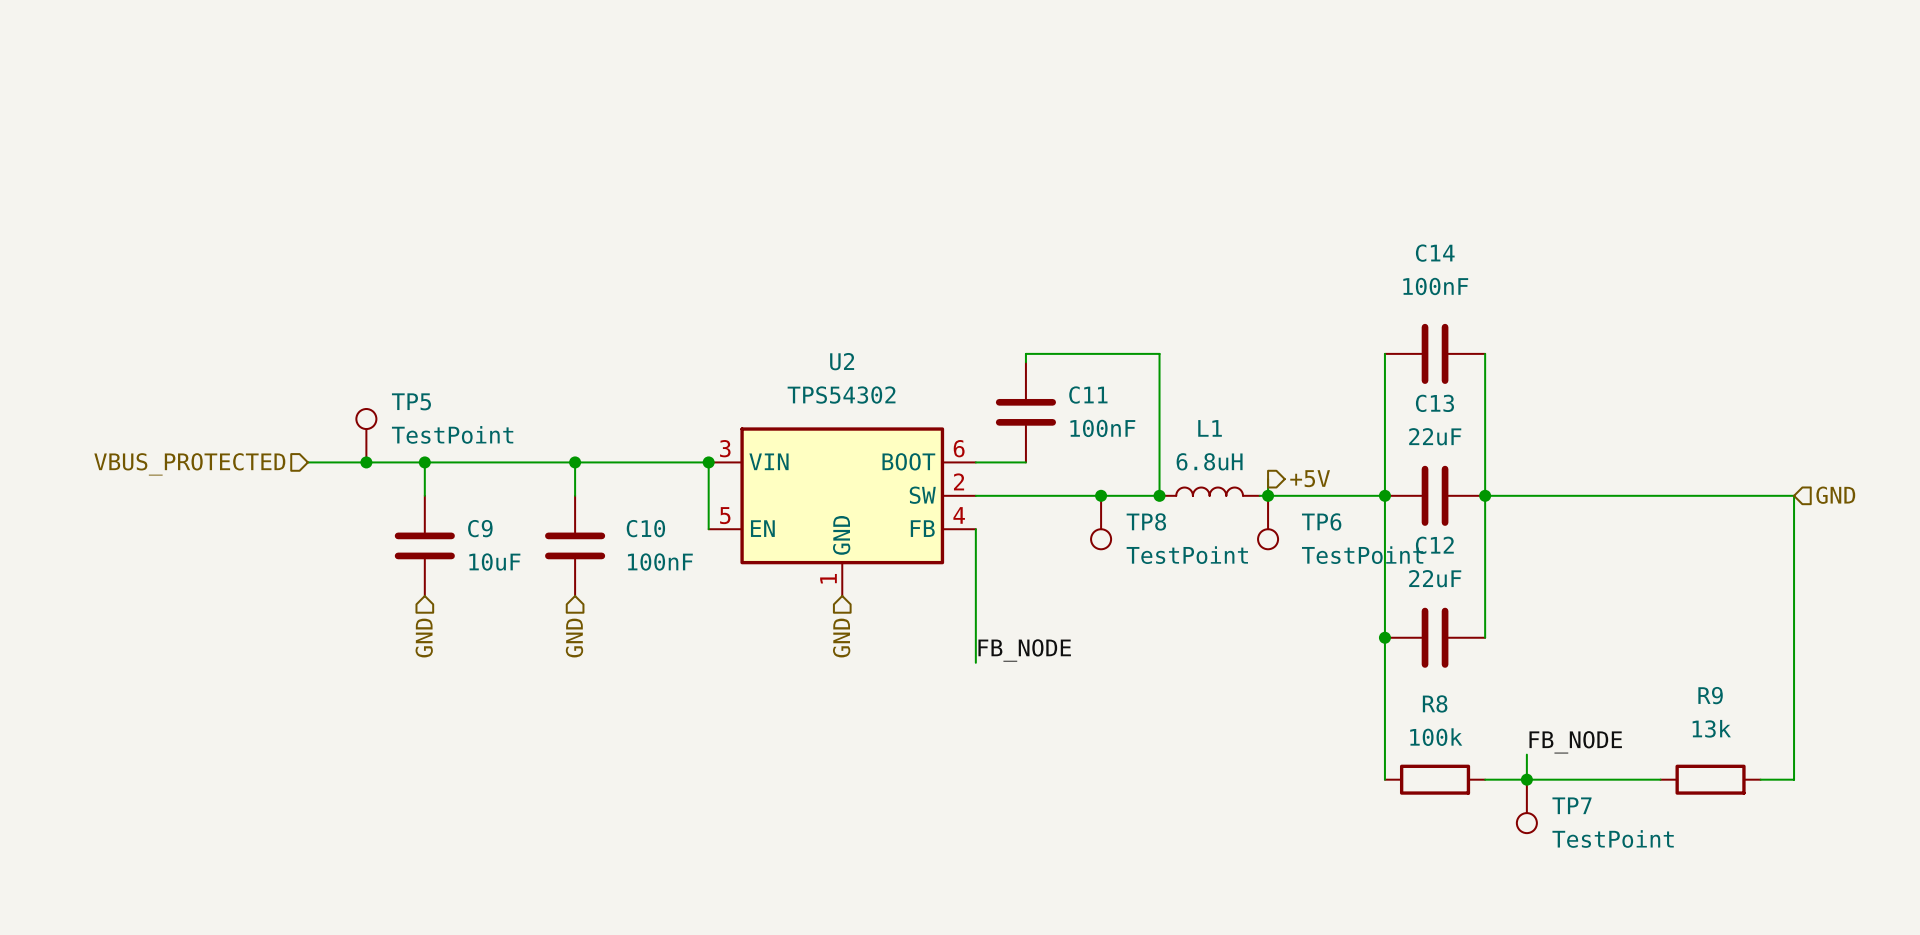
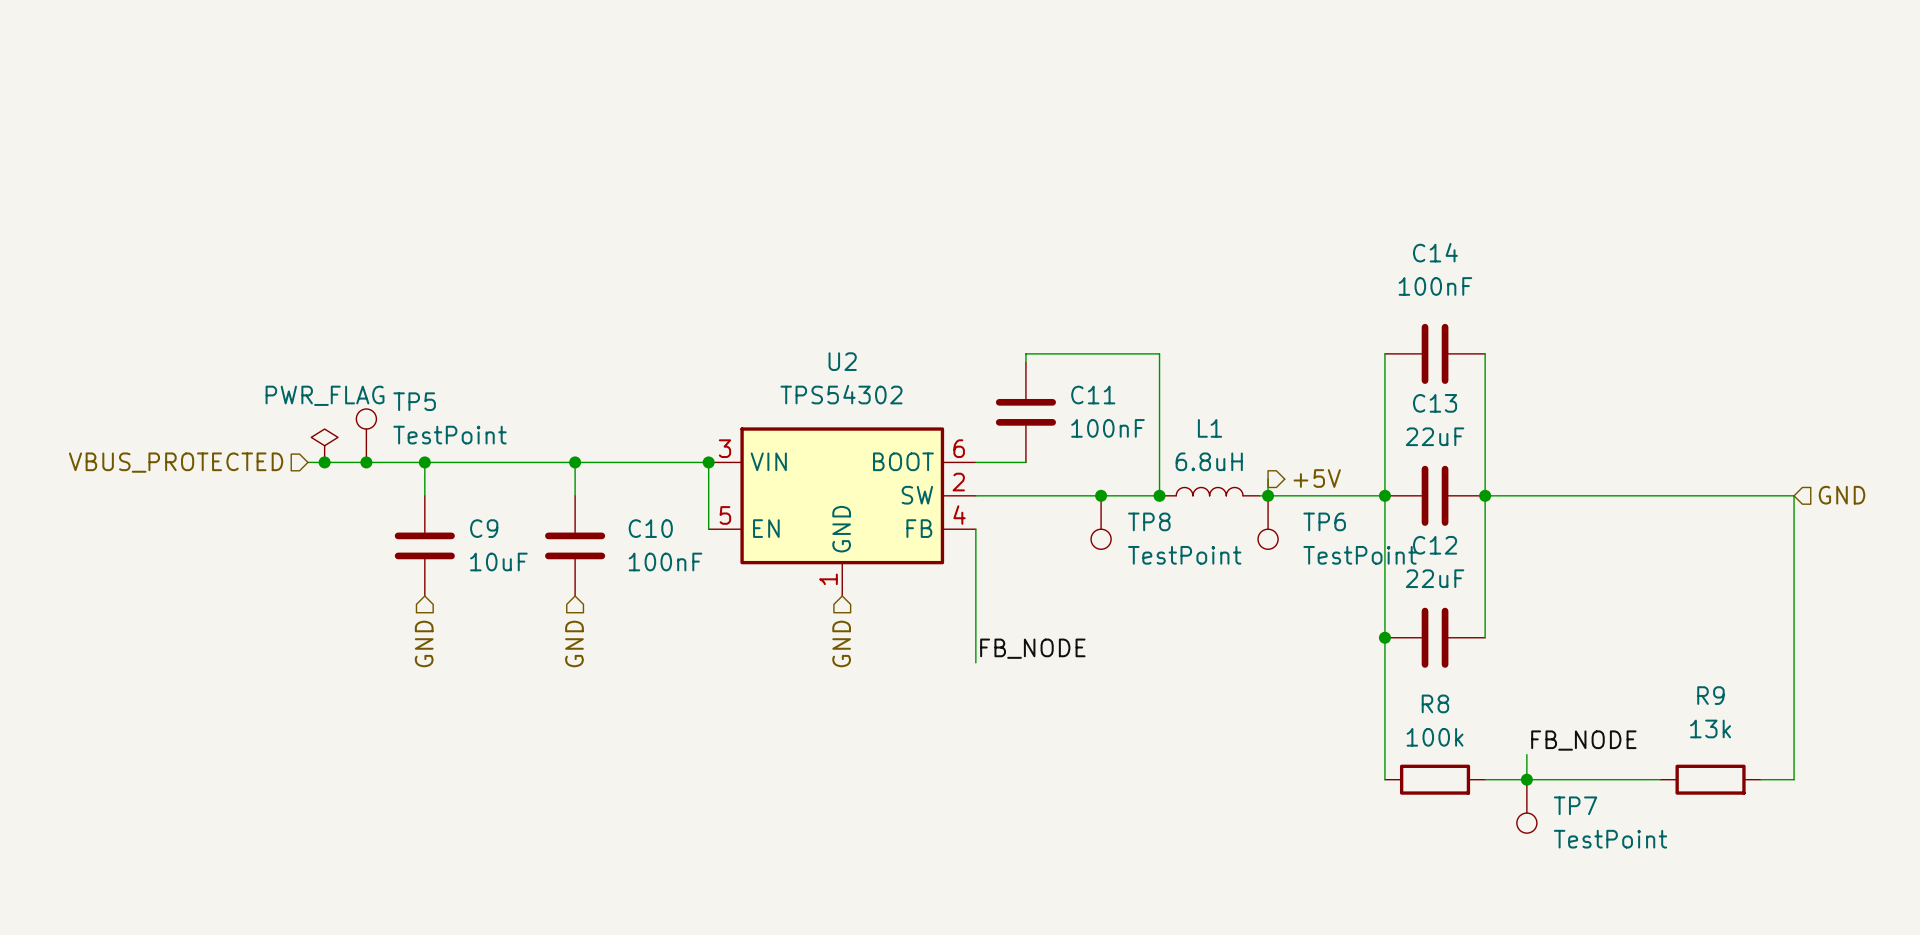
power symbol: none -> PWR_FLAG (324, 445)
junction: none -> (324, 462)

